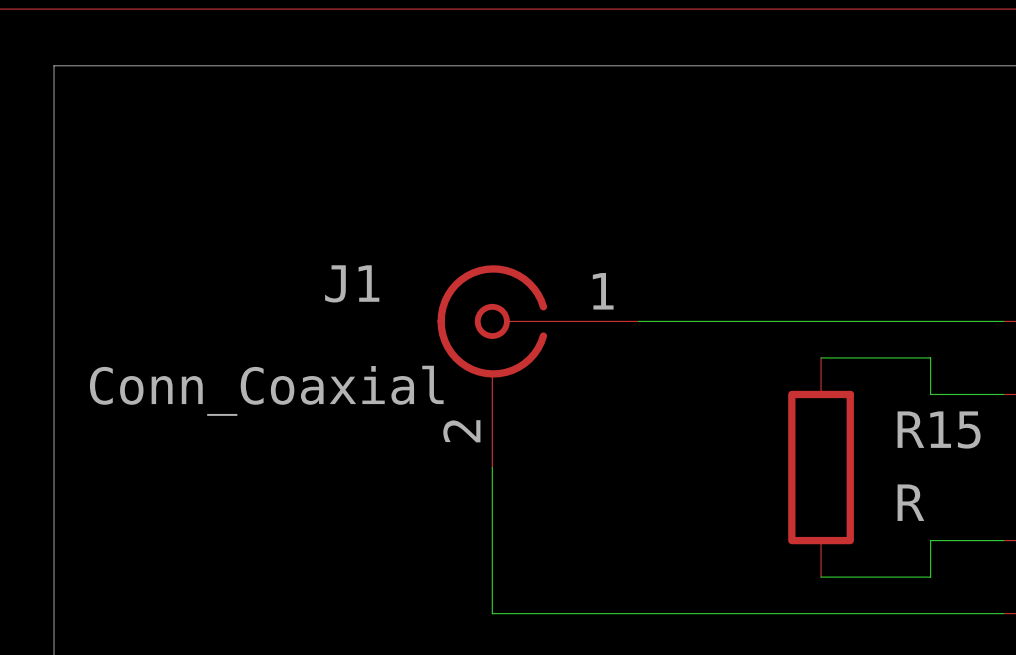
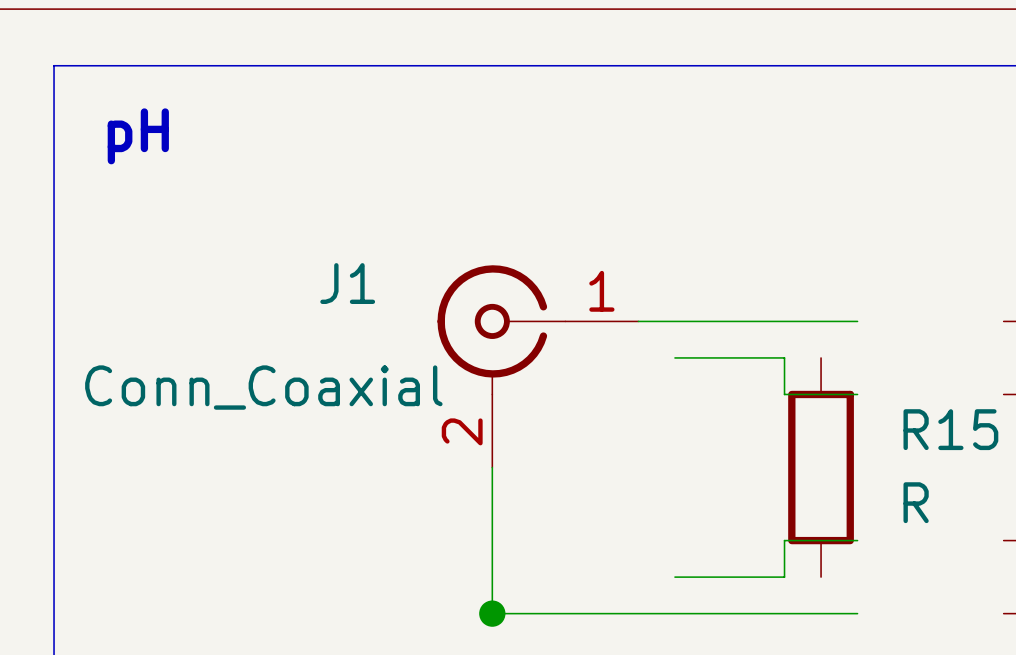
text: none -> pH (138, 136)
wire: (857, 321) (1003, 321) -> none
wire: (821, 357) (930, 357) (930, 394) (1003, 394) -> (674, 357) (784, 357) (784, 394) (857, 394)
wire: (1003, 540) (930, 540) (930, 577) (821, 577) -> (857, 540) (784, 540) (784, 577) (674, 577)
junction: none -> (492, 613)
wire: (857, 613) (1003, 613) -> none

